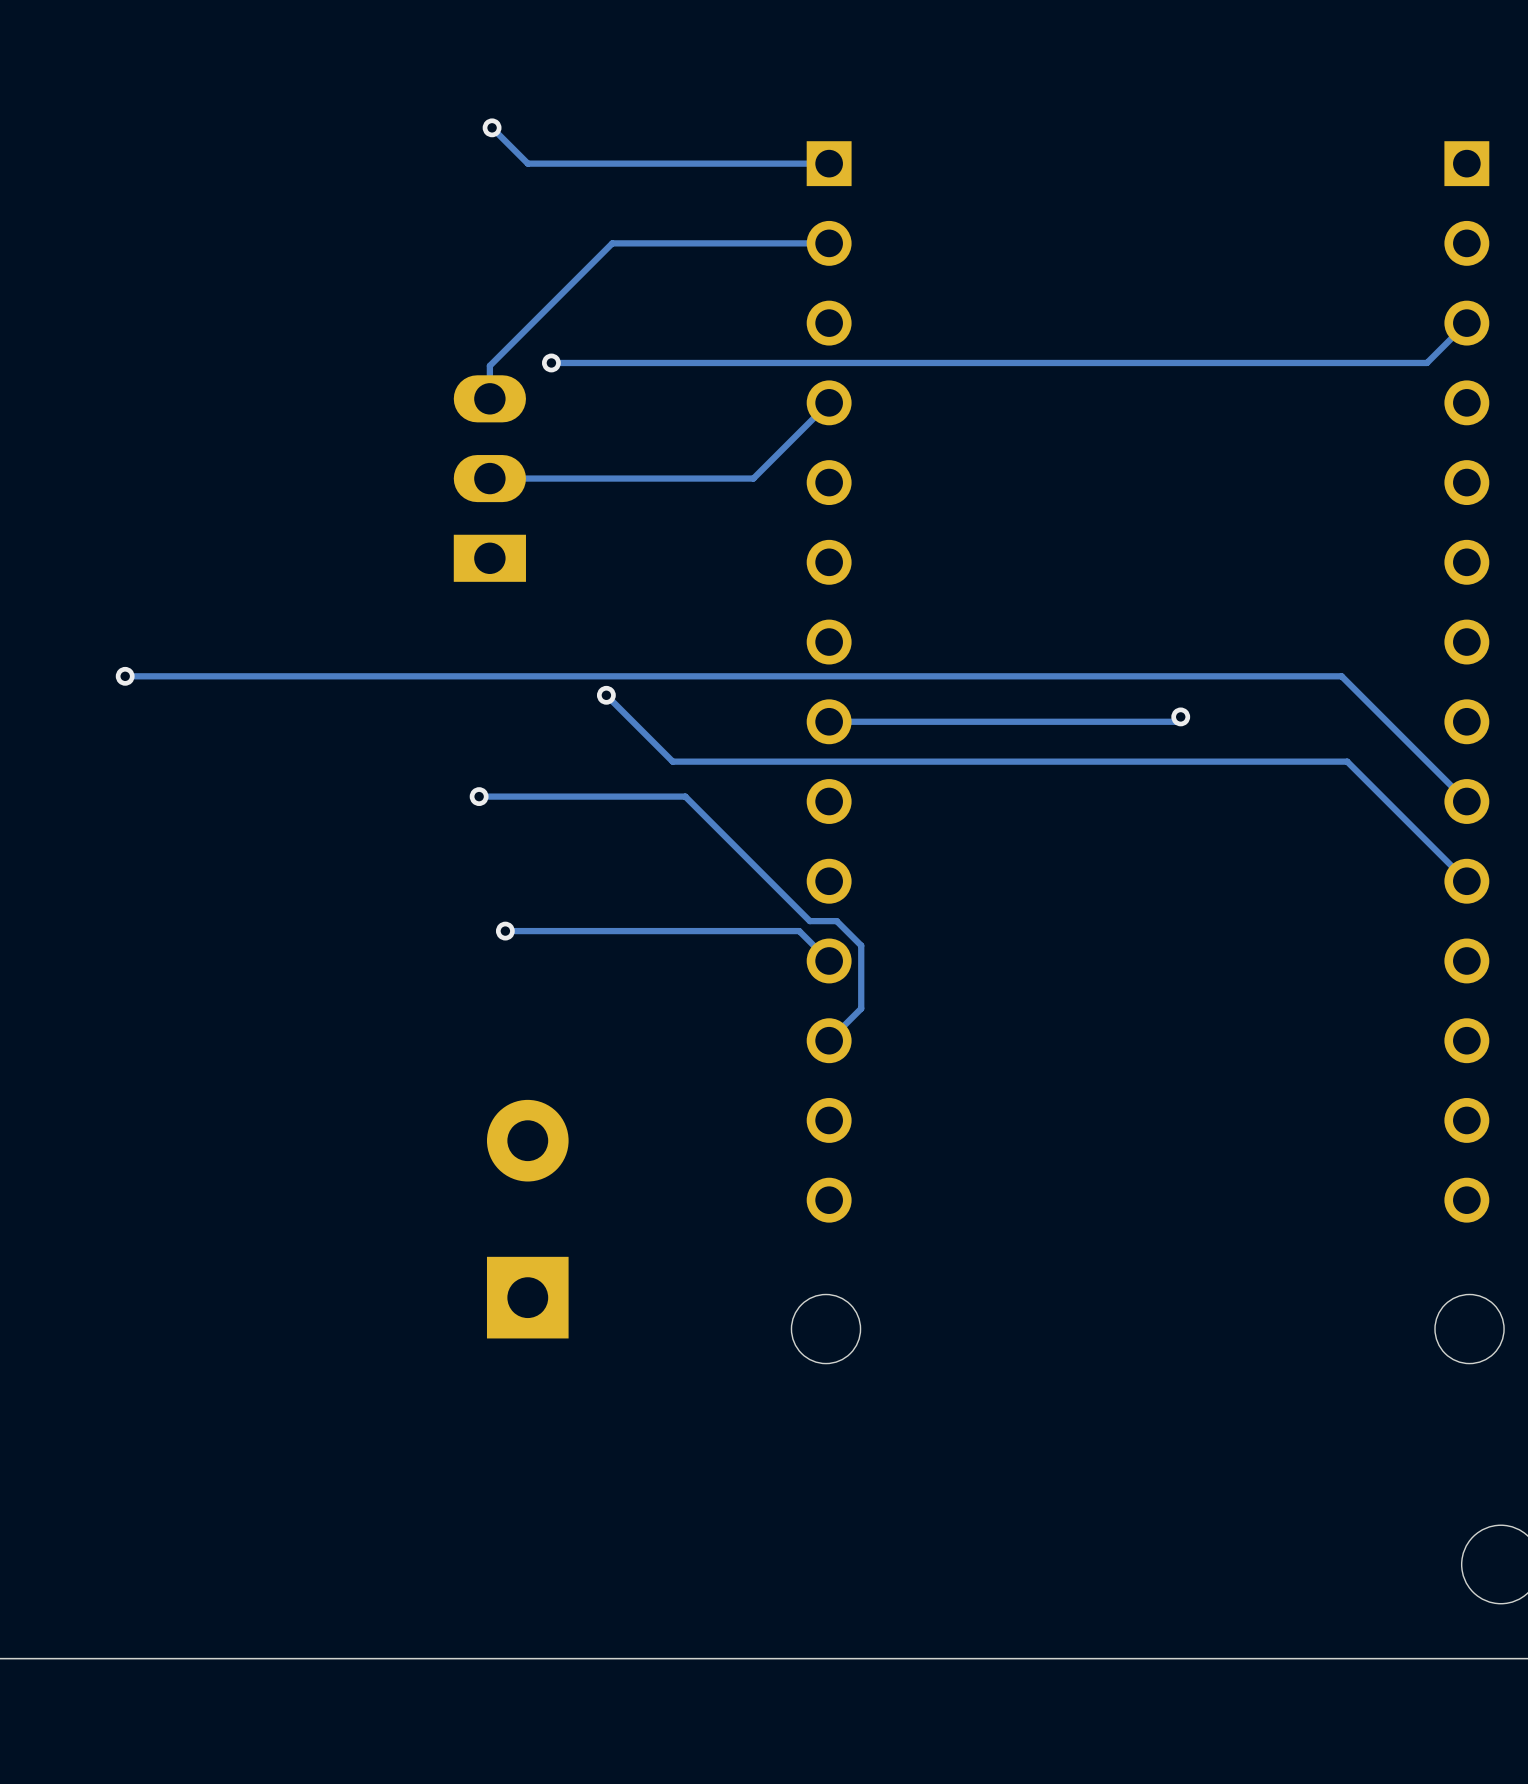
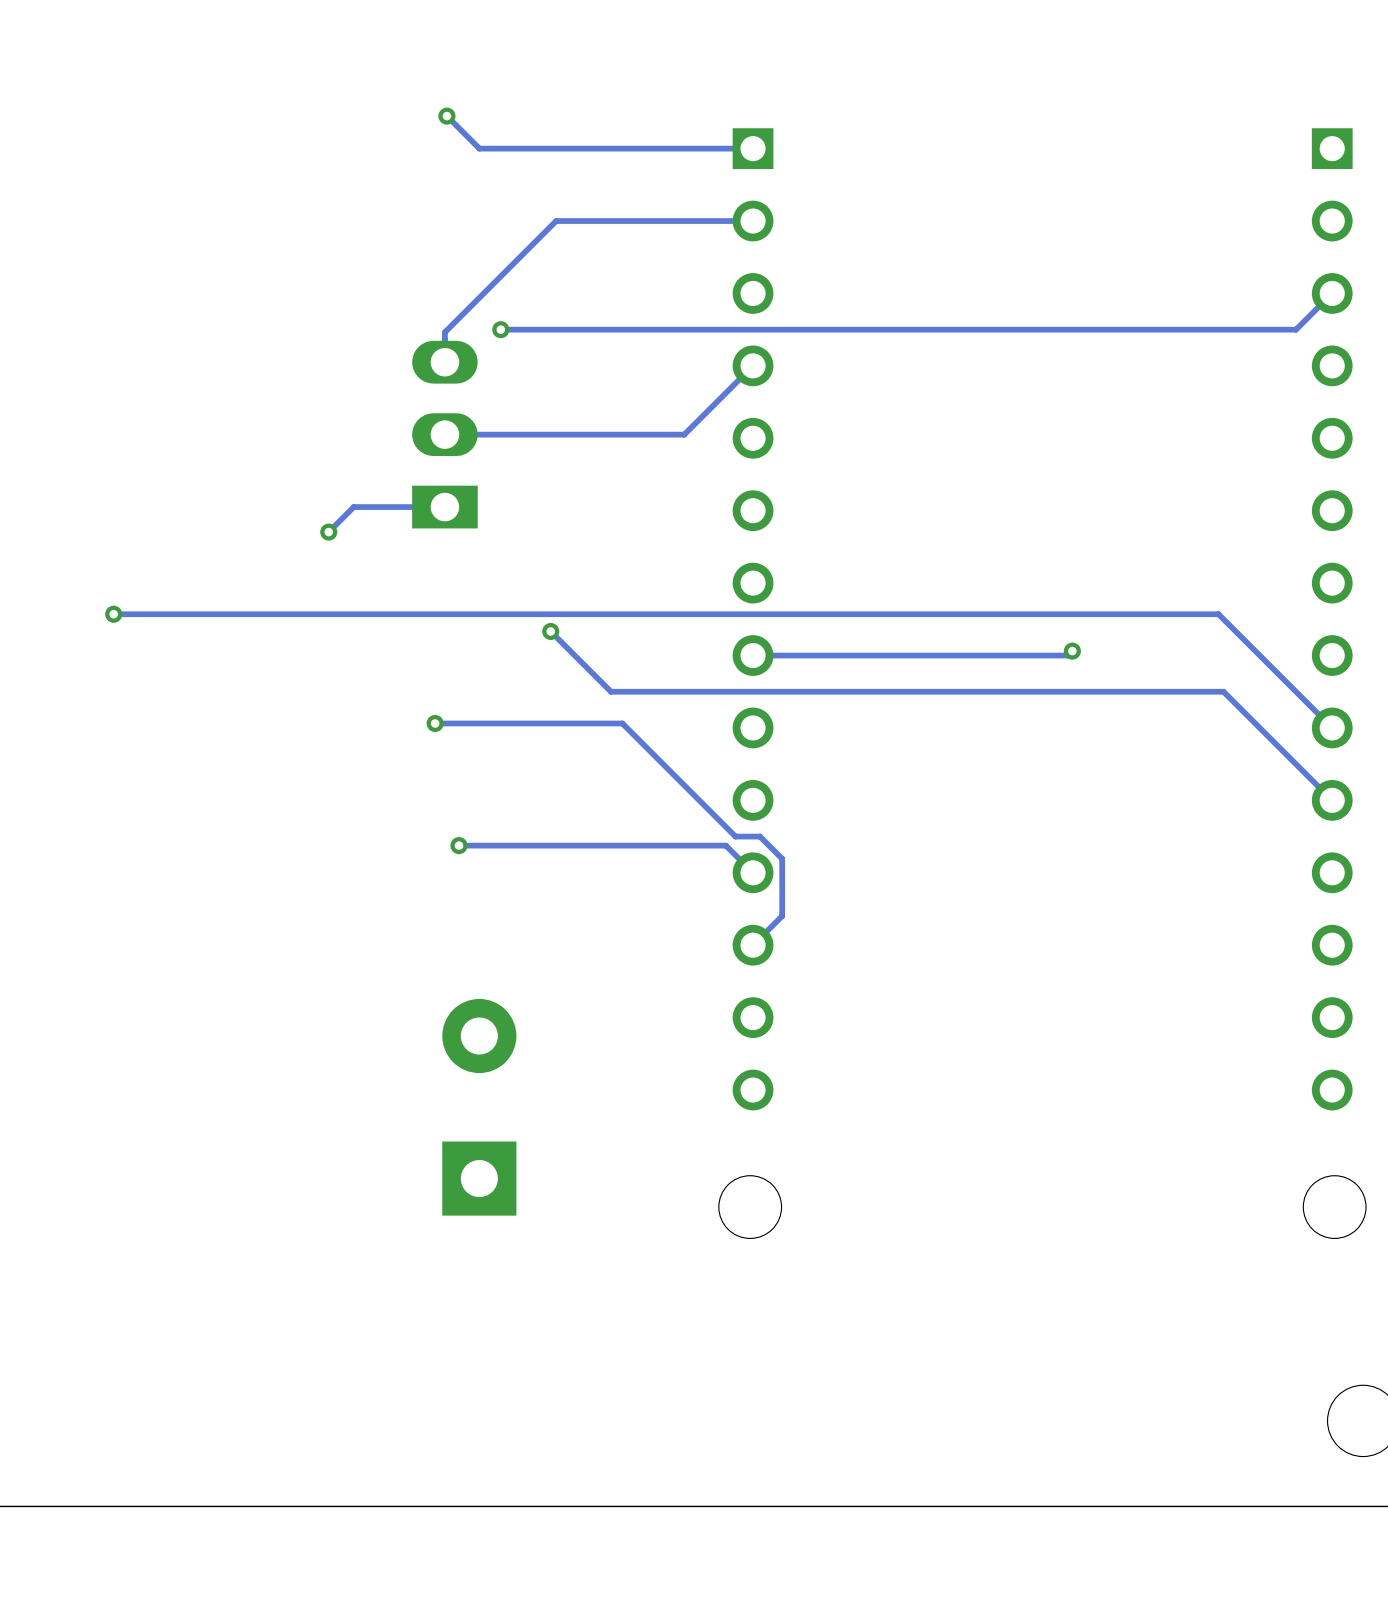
track: none -> (444, 507) (353, 507) (328, 532)
via: none -> (328, 532)

